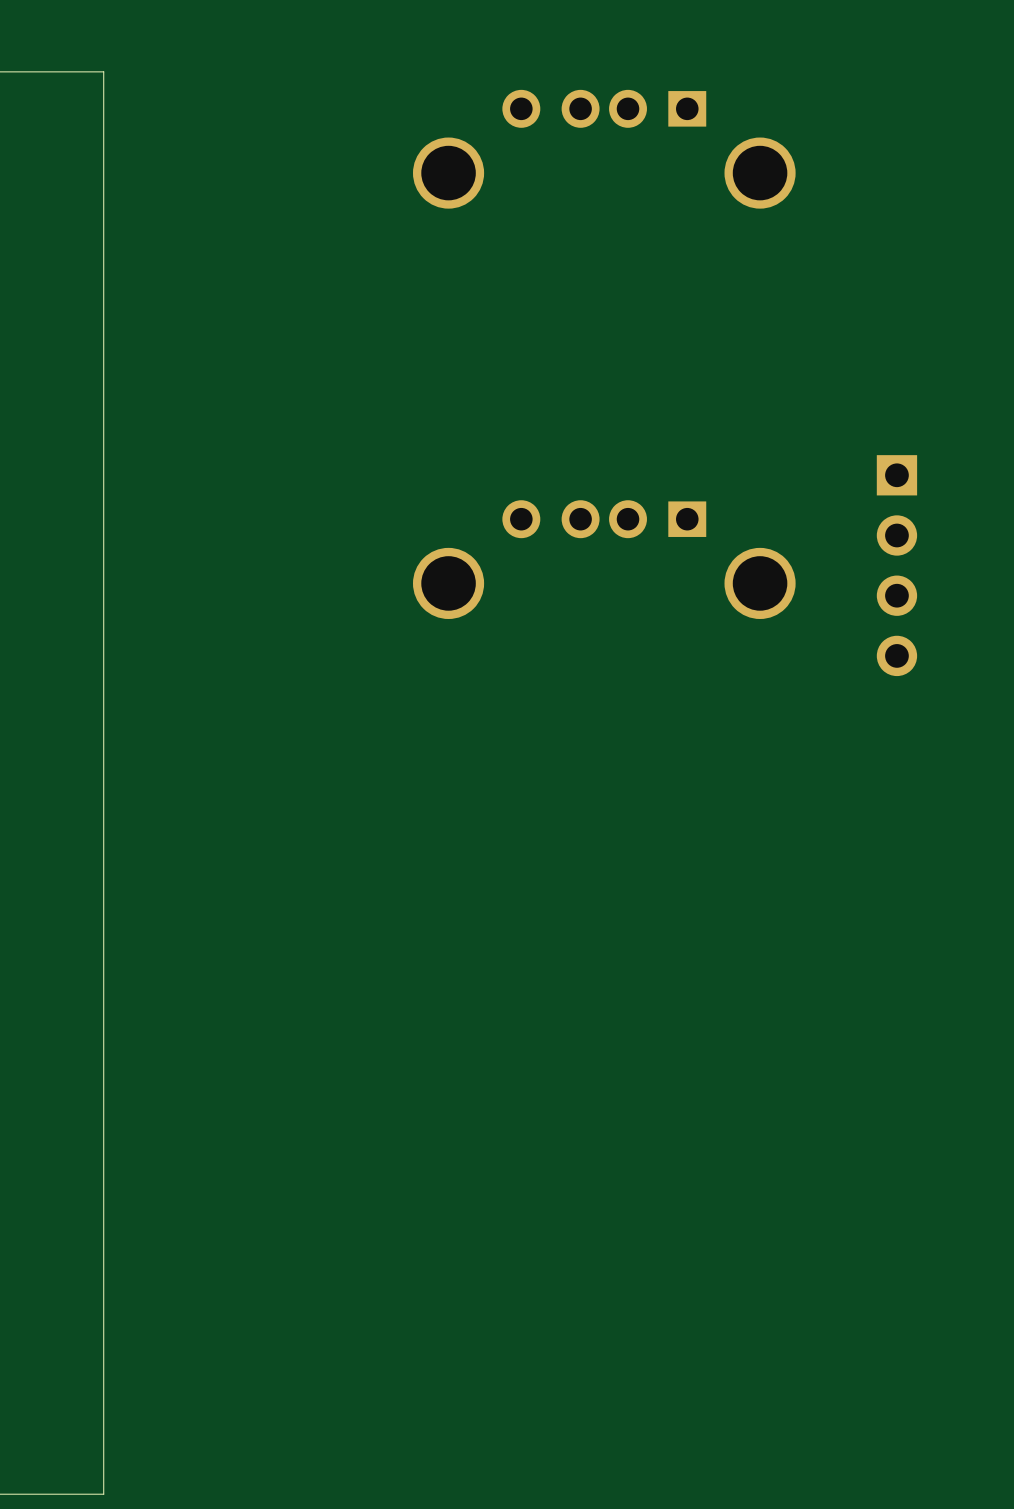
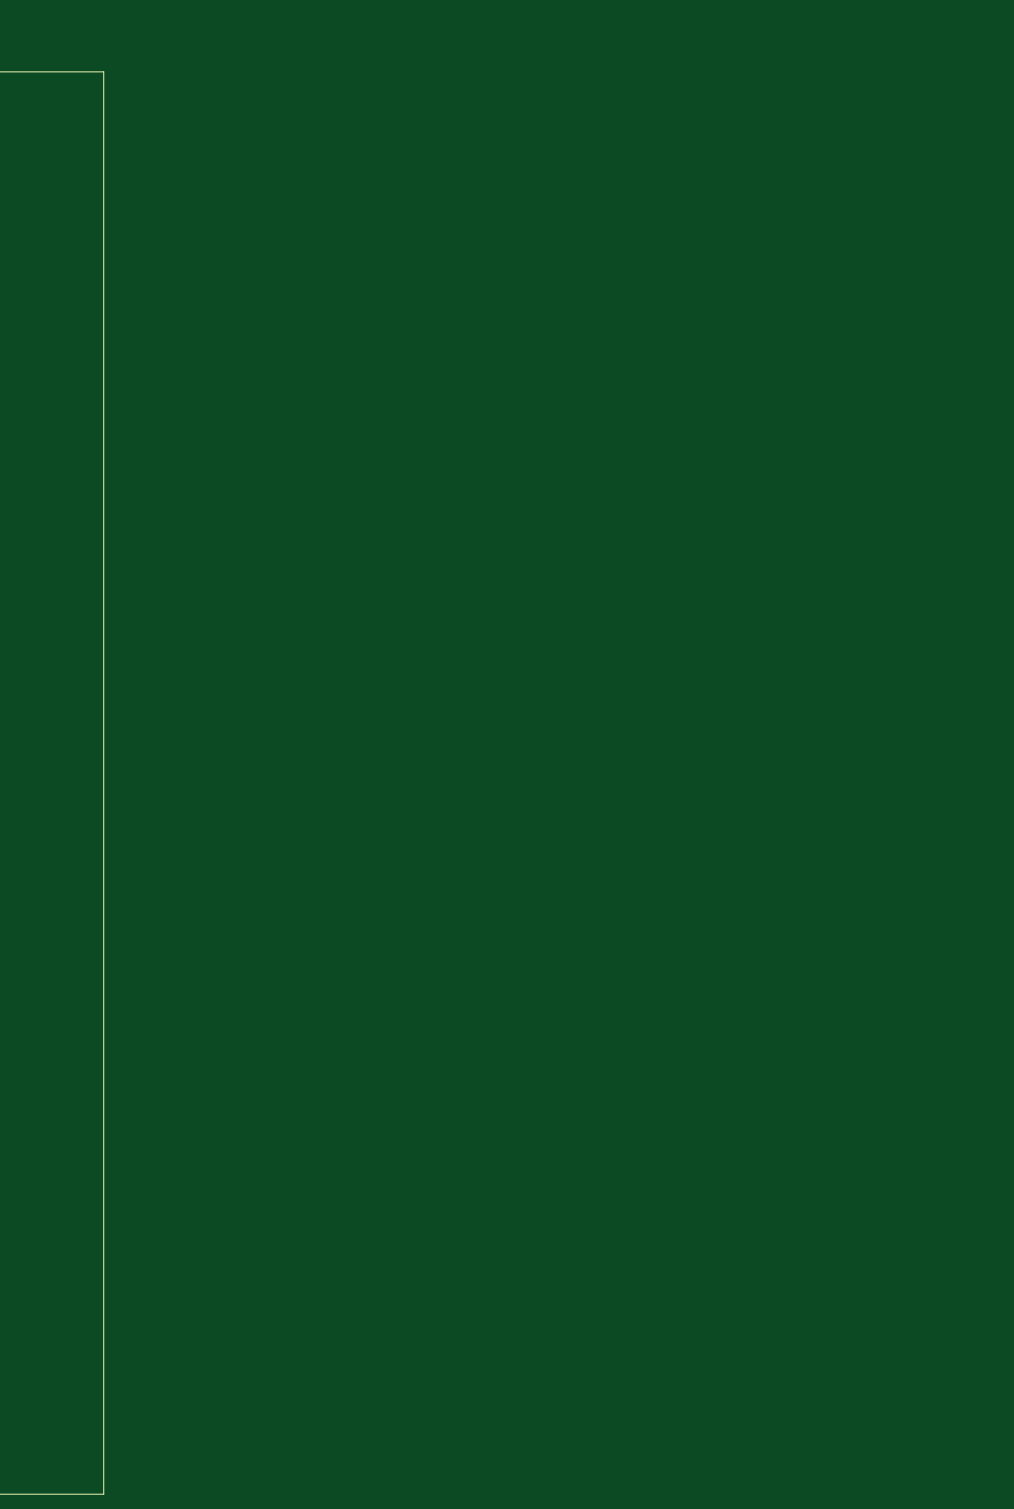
part: (604, 149) -> none
part: (604, 559) -> none
part: (896, 565) -> none

